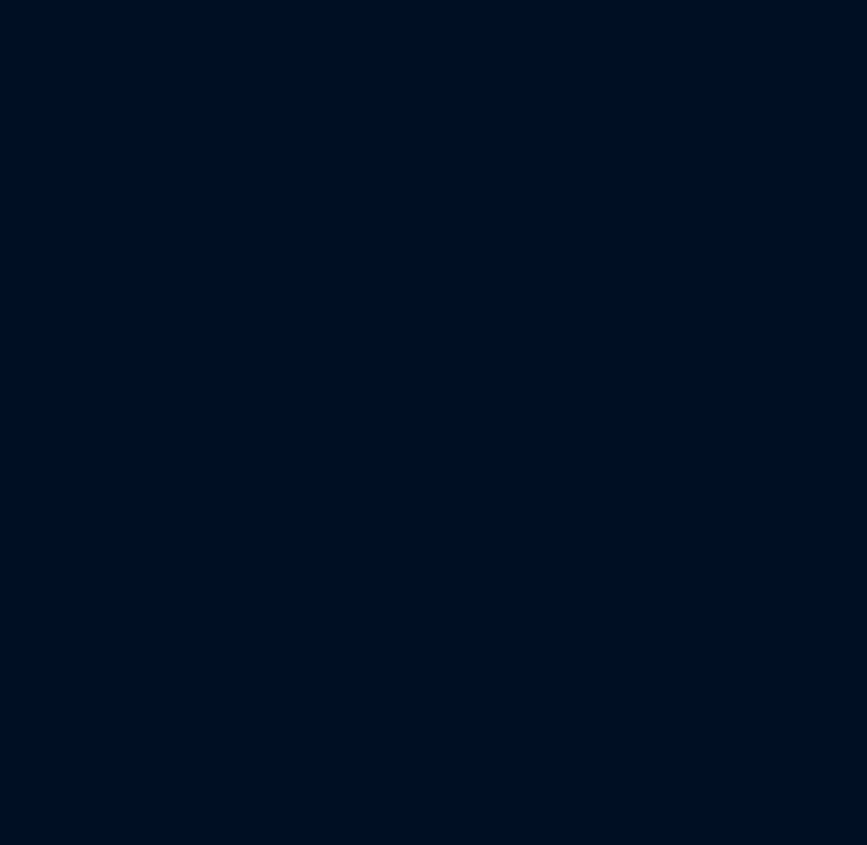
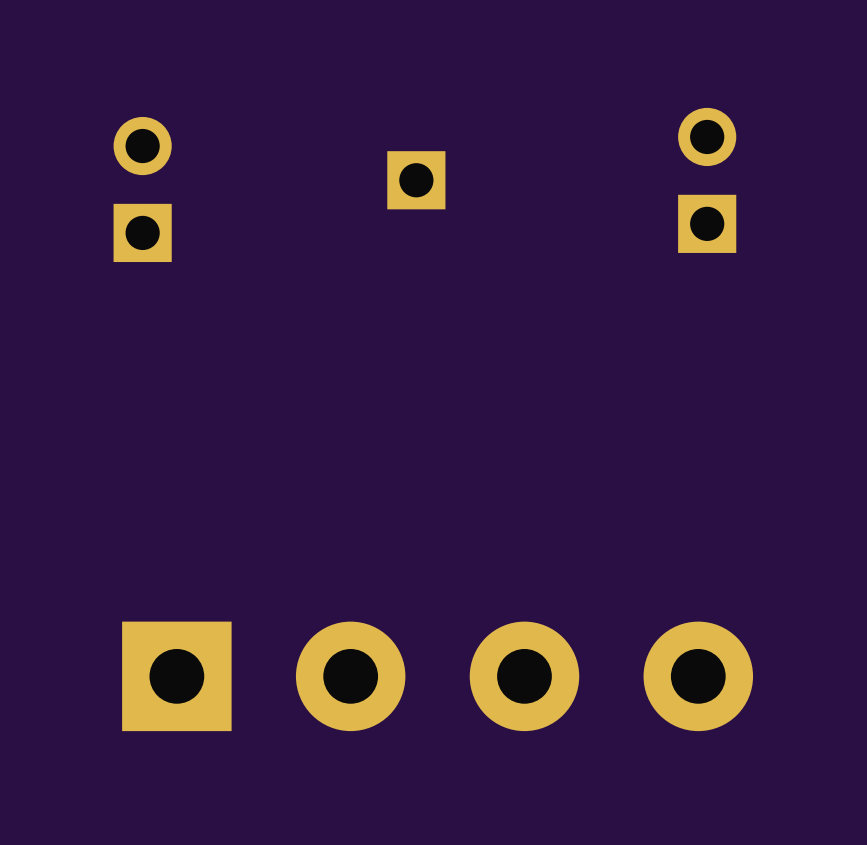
part: none -> (416, 180)
part: none -> (707, 180)
part: none -> (142, 189)
part: none -> (437, 676)

